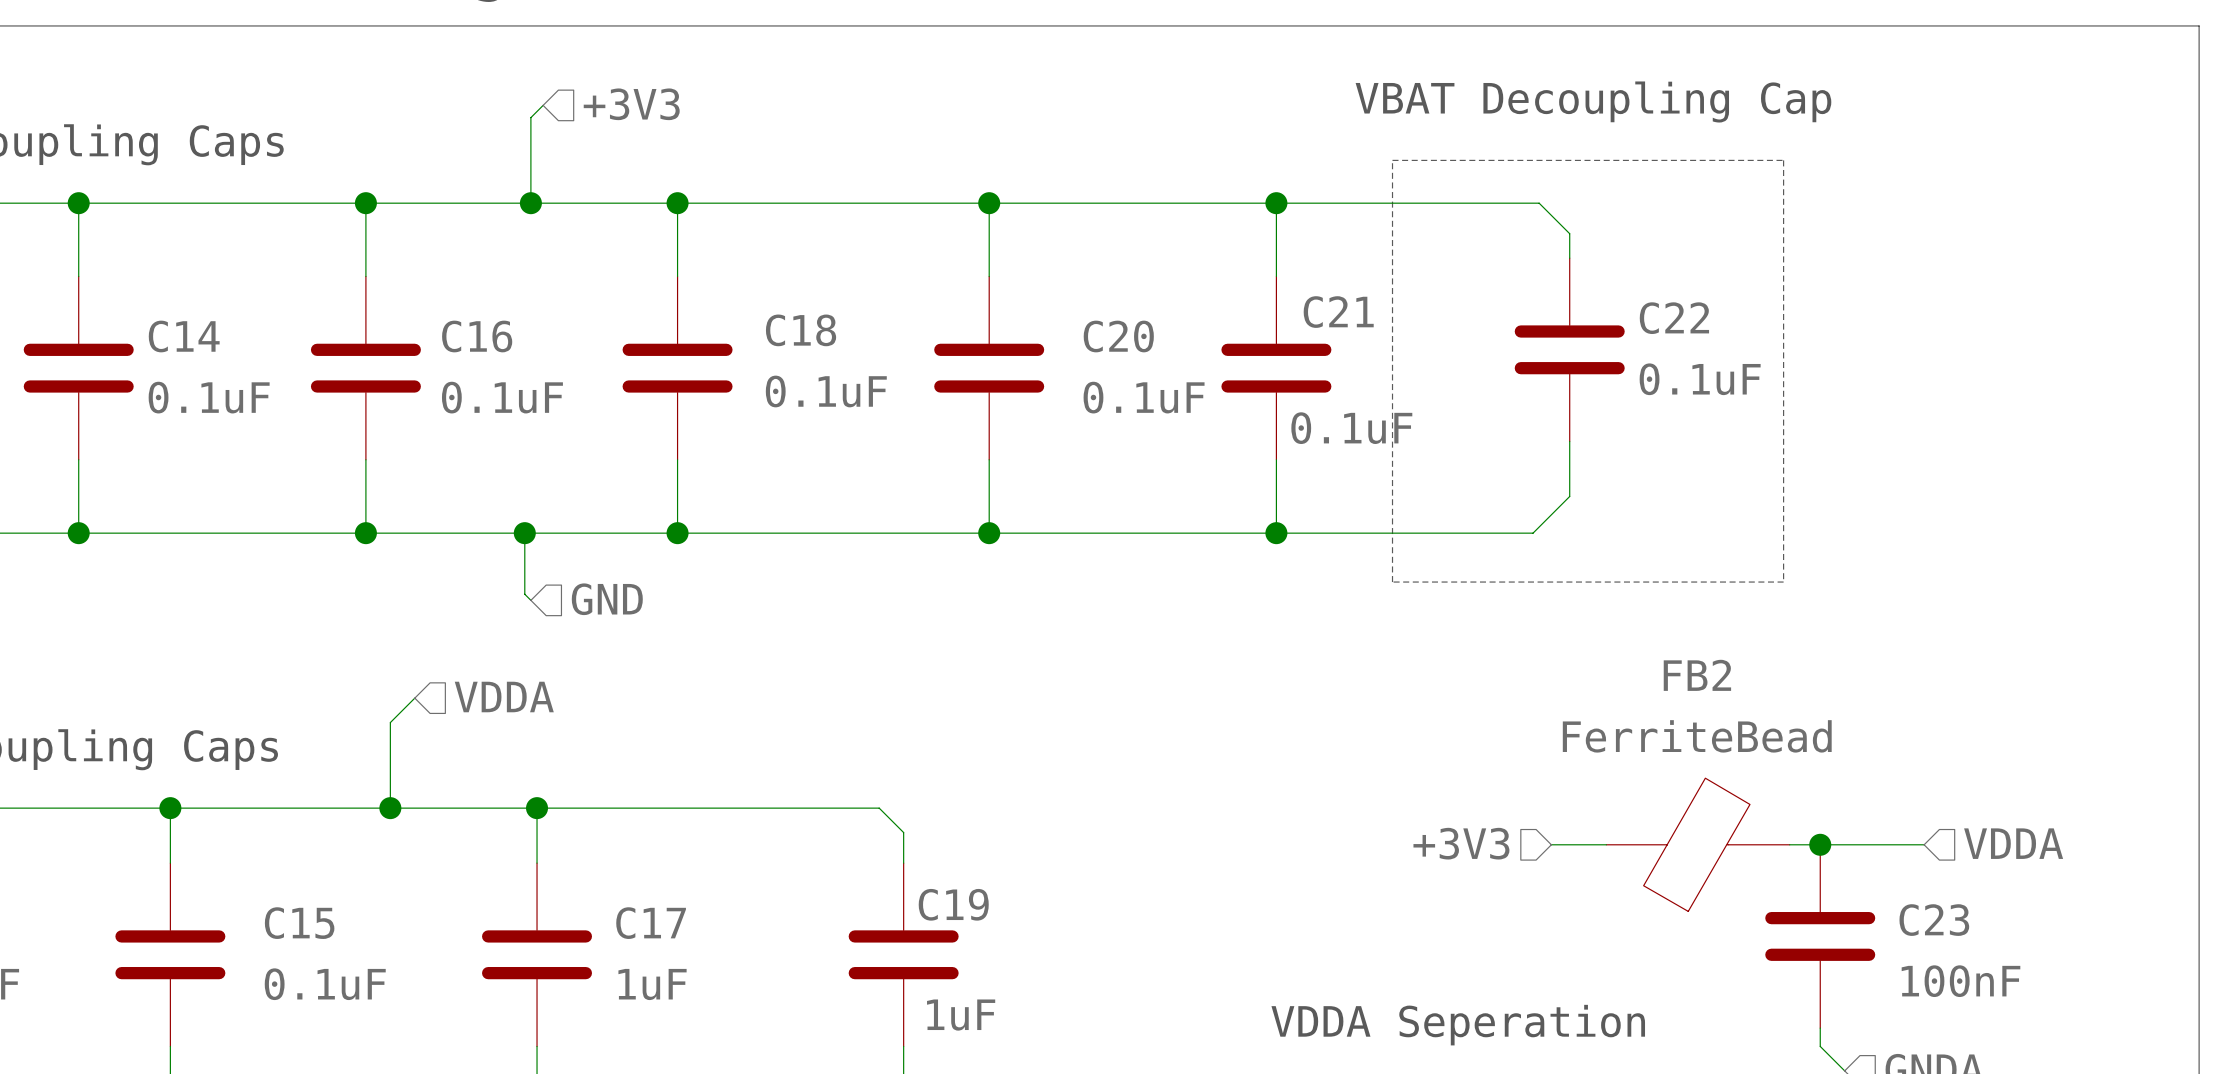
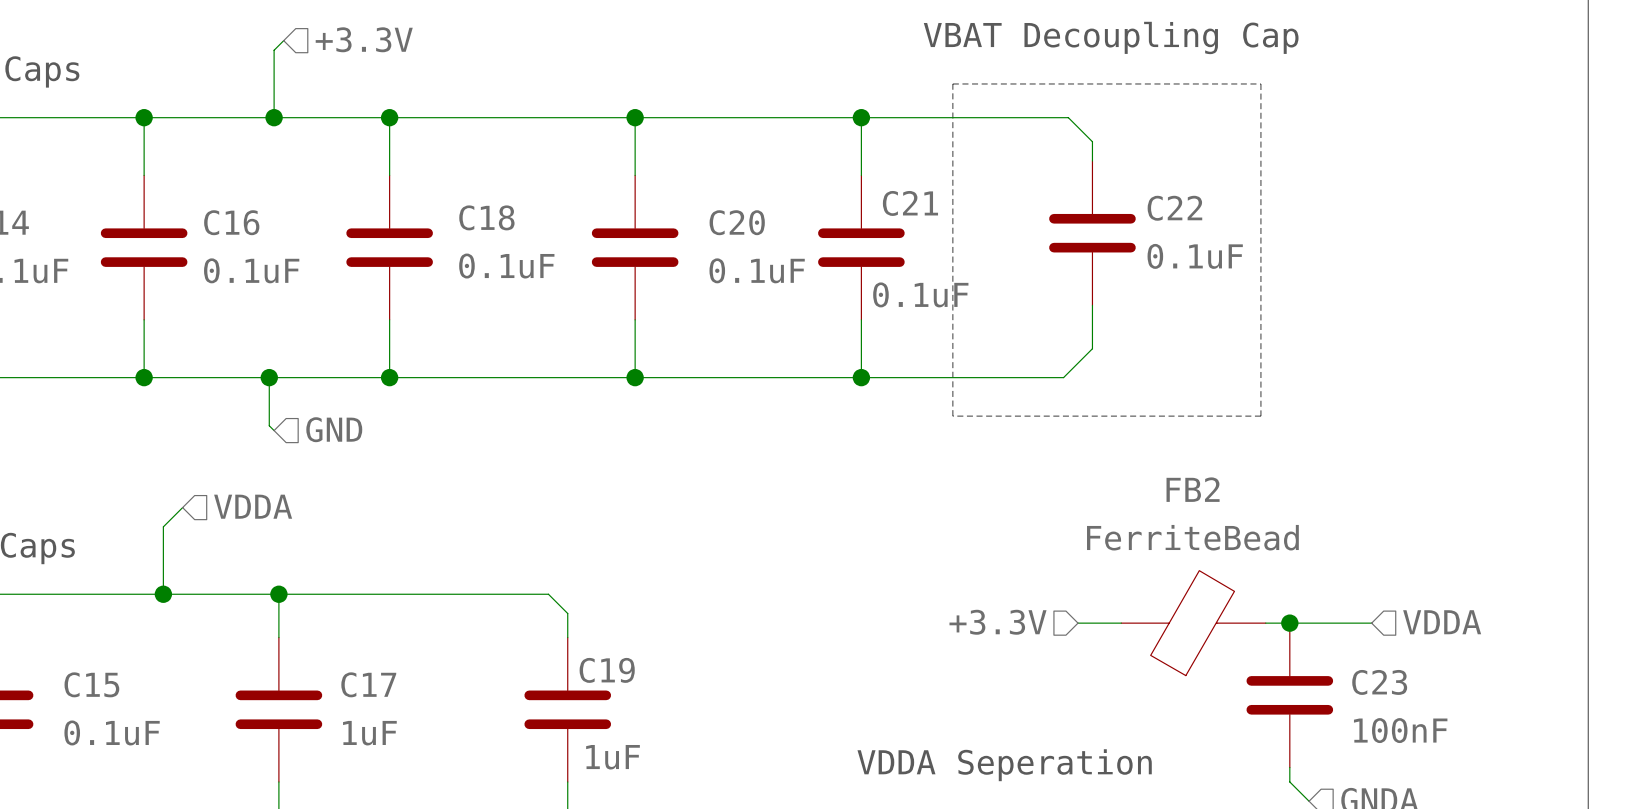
hierarchical label: +3V3 (631, 104) -> +3.3V (364, 39)
hierarchical label: +3V3 (1461, 843) -> +3.3V (998, 622)

